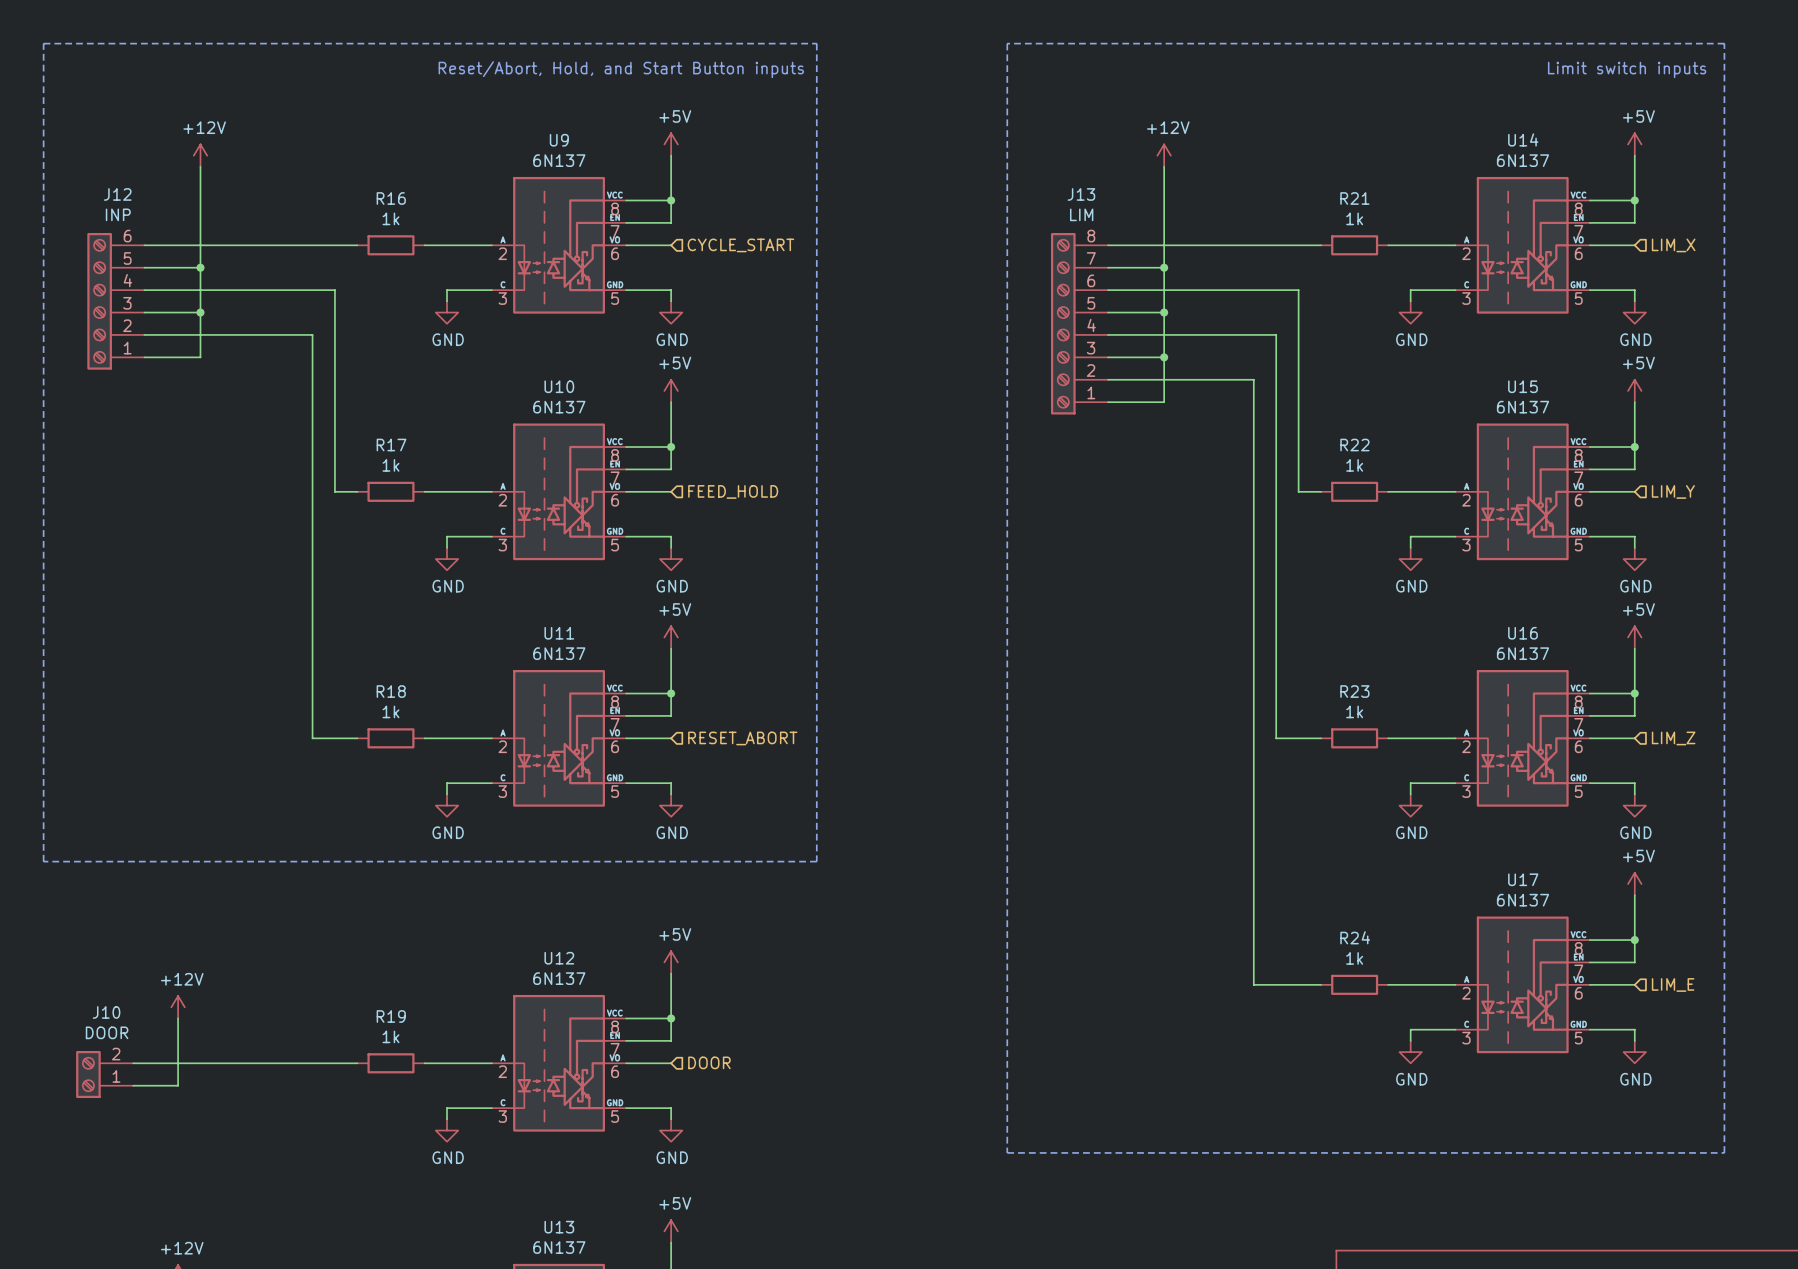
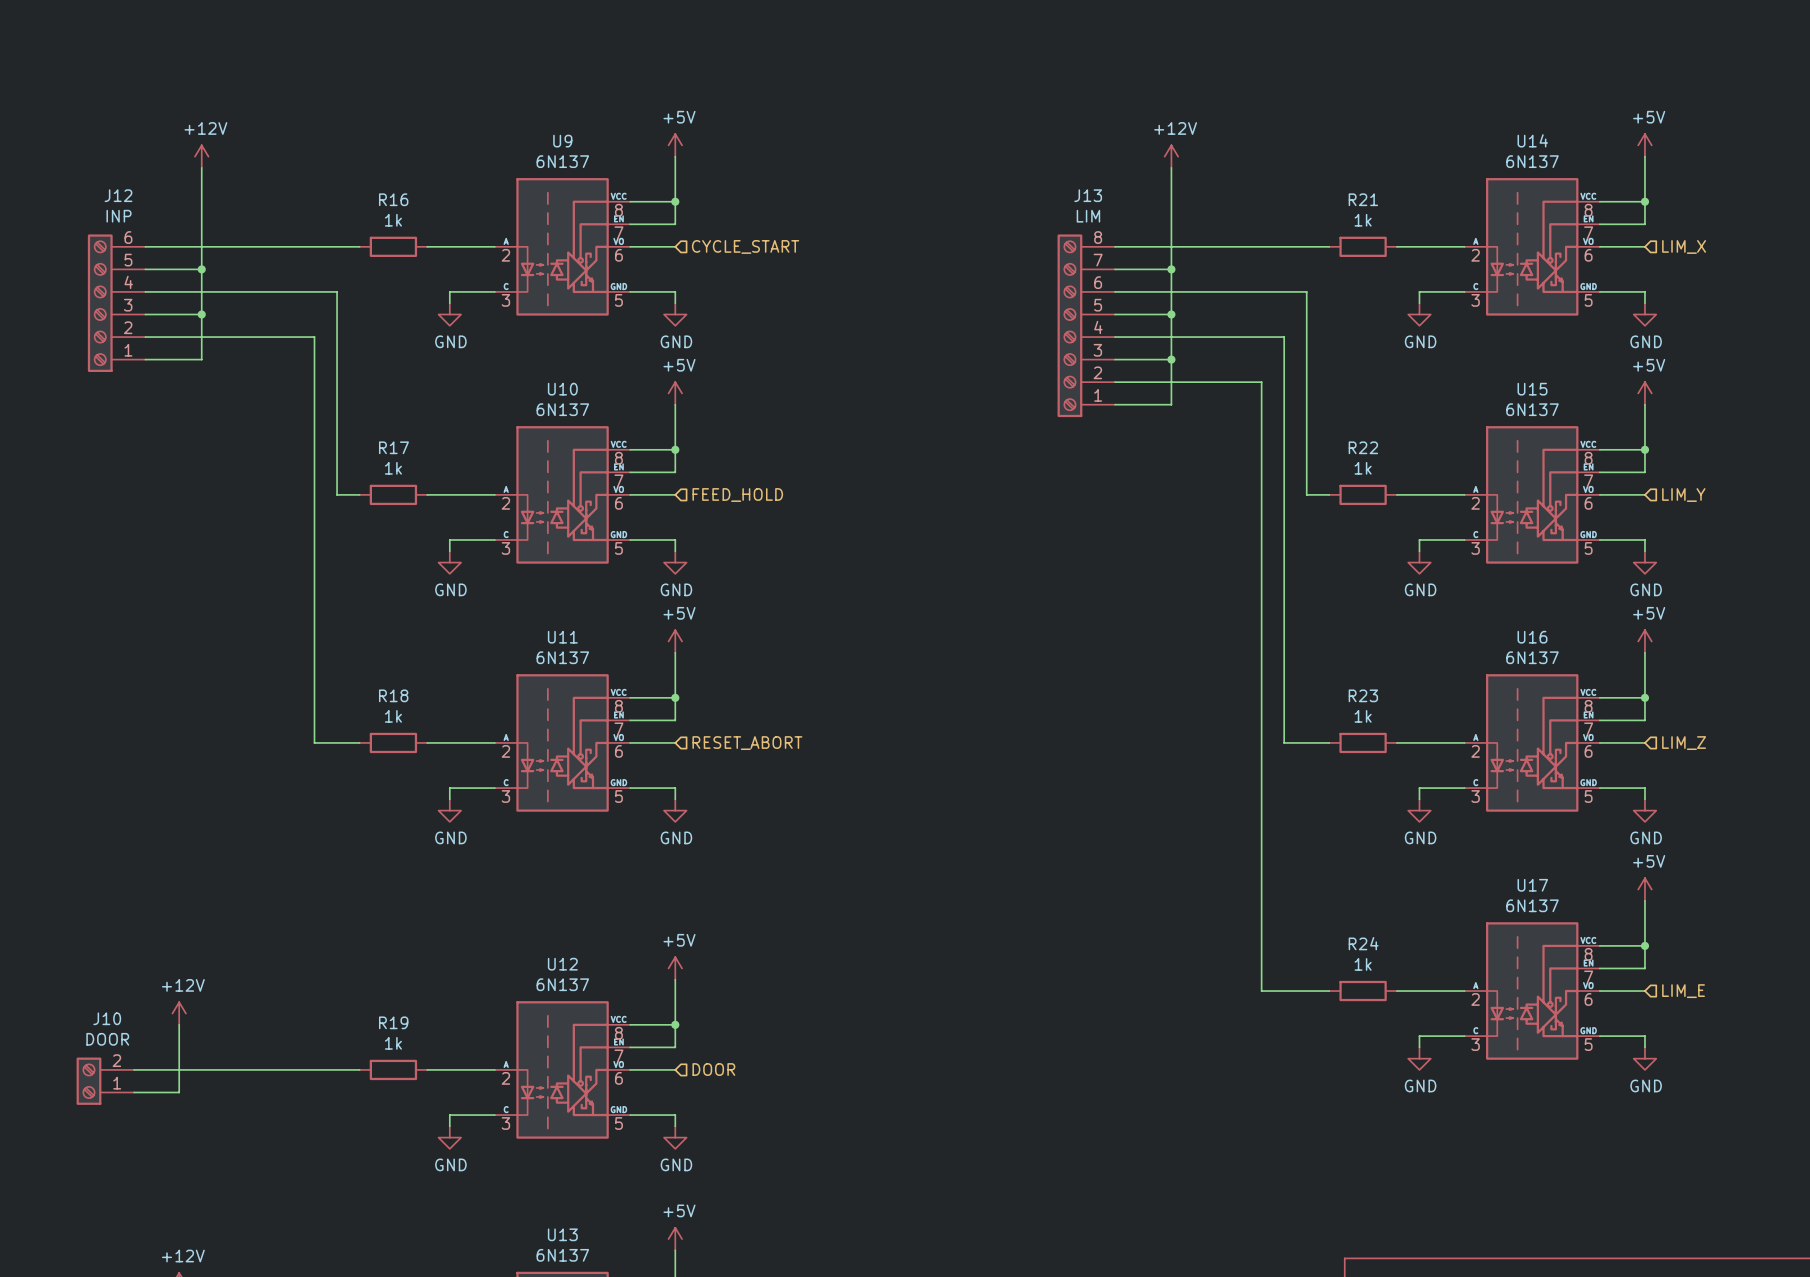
line: (43, 43) (816, 43) (816, 861) (43, 861) (43, 43) -> none
line: (1007, 43) (1007, 1152) (1724, 1152) (1724, 43) (1007, 43) -> none
text: Reset/Abort, Hold, and Start Button inputs (621, 69) -> none
text: Limit switch inputs (1627, 69) -> none

